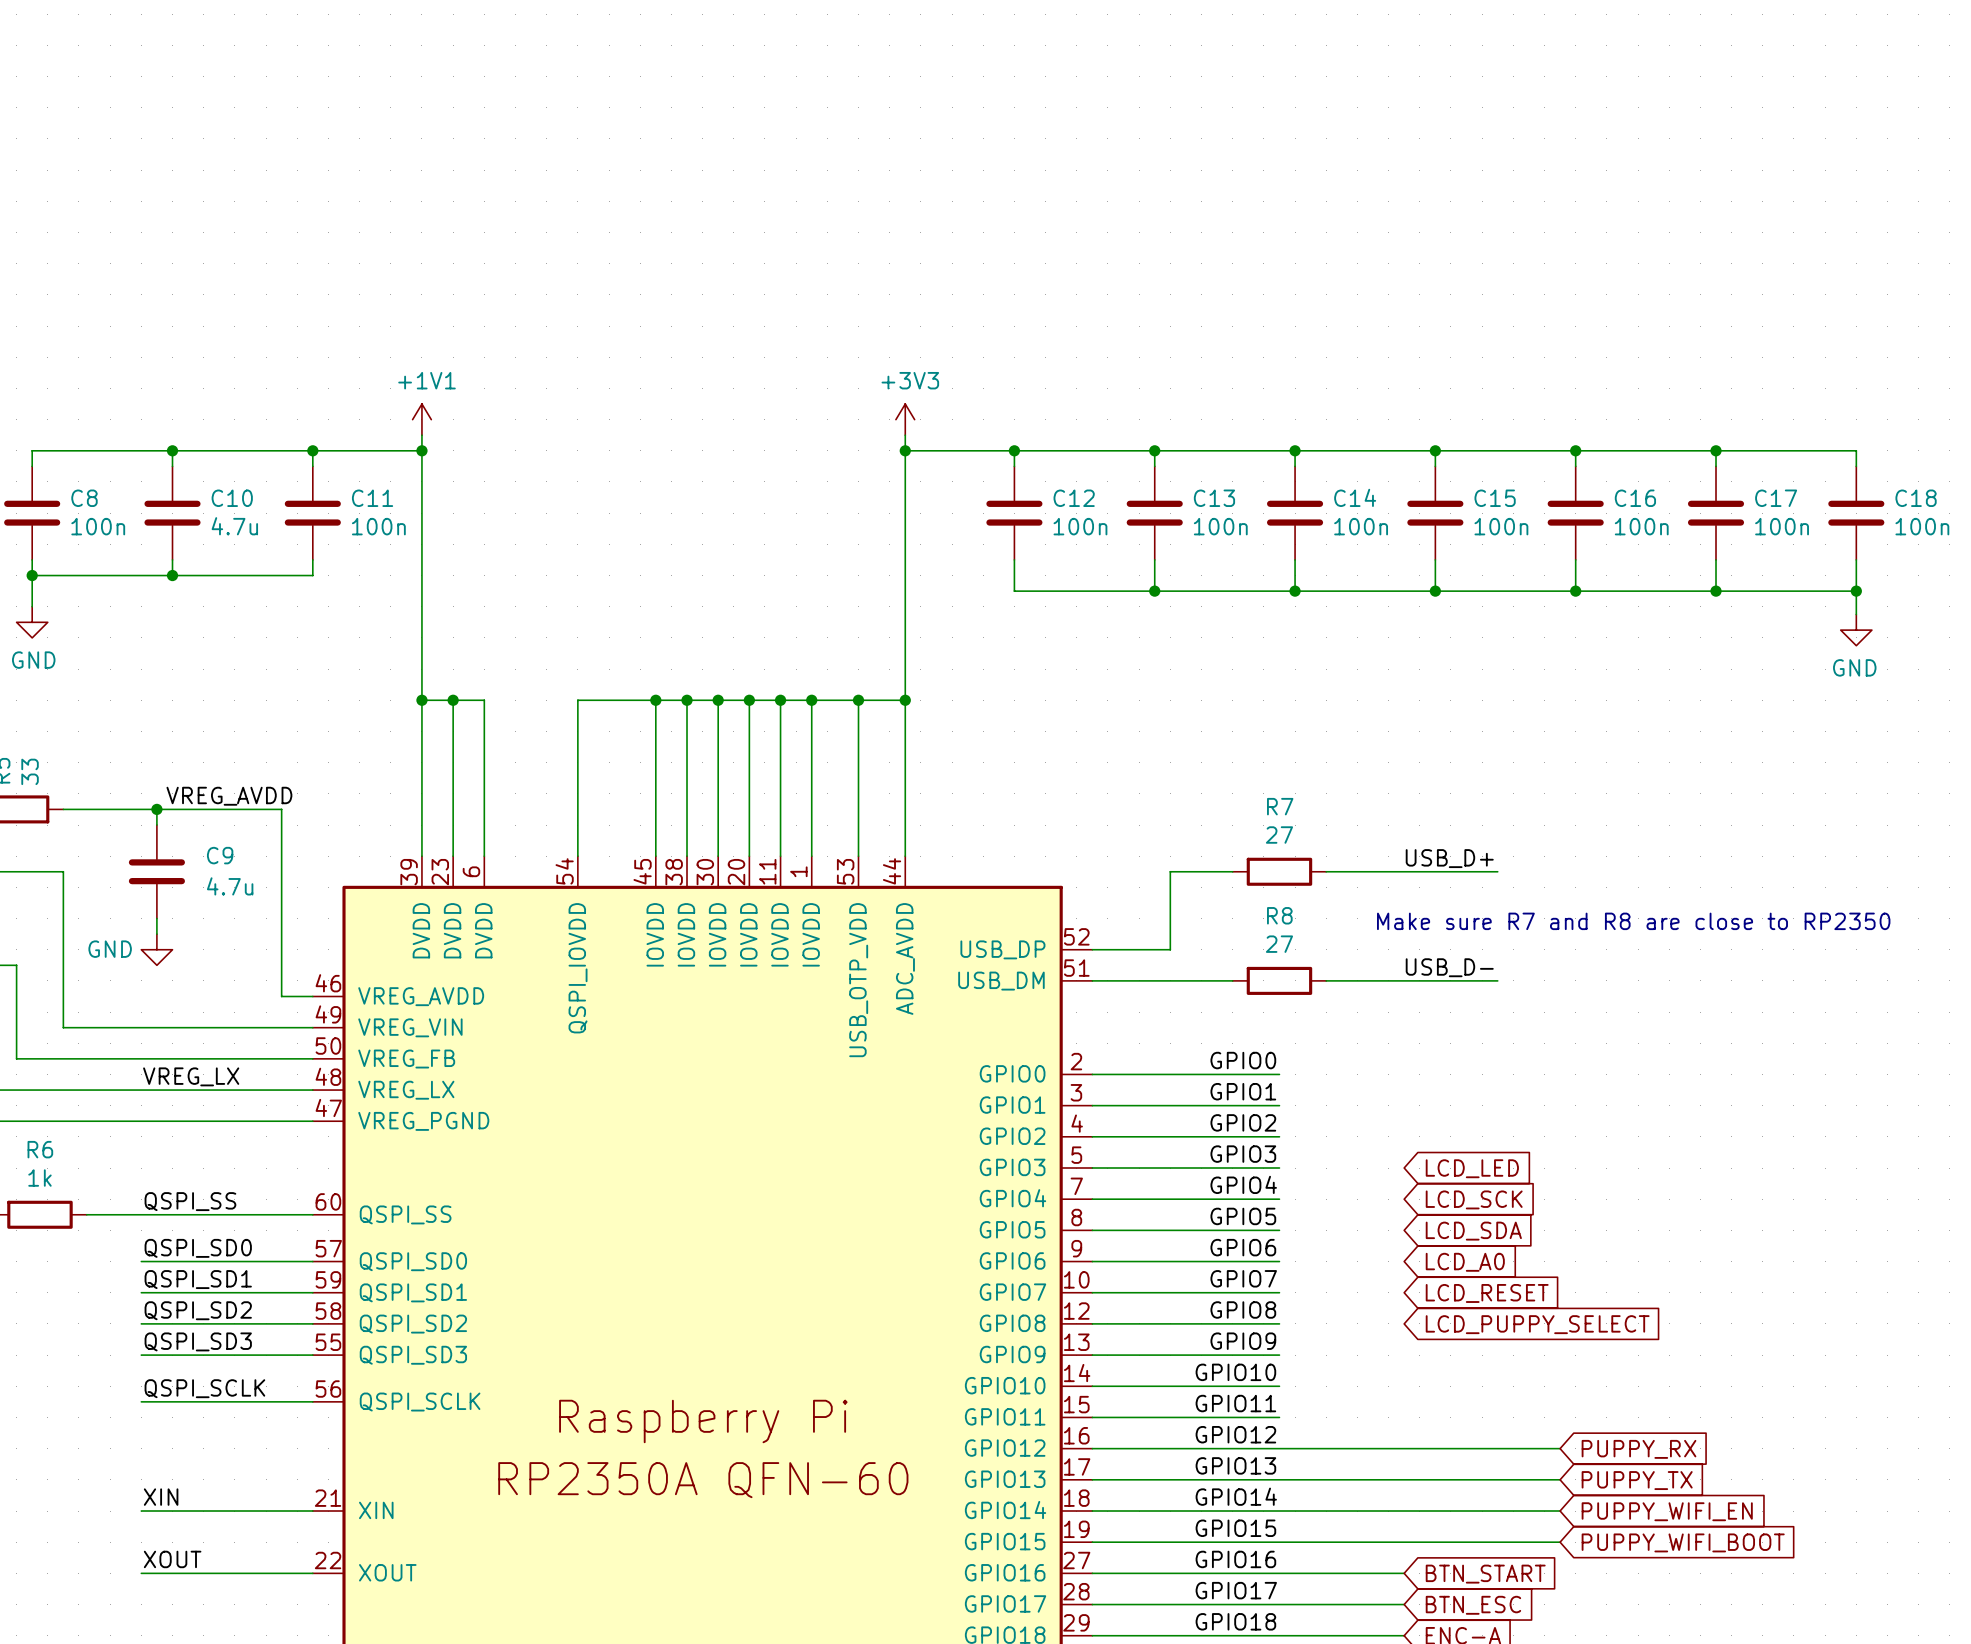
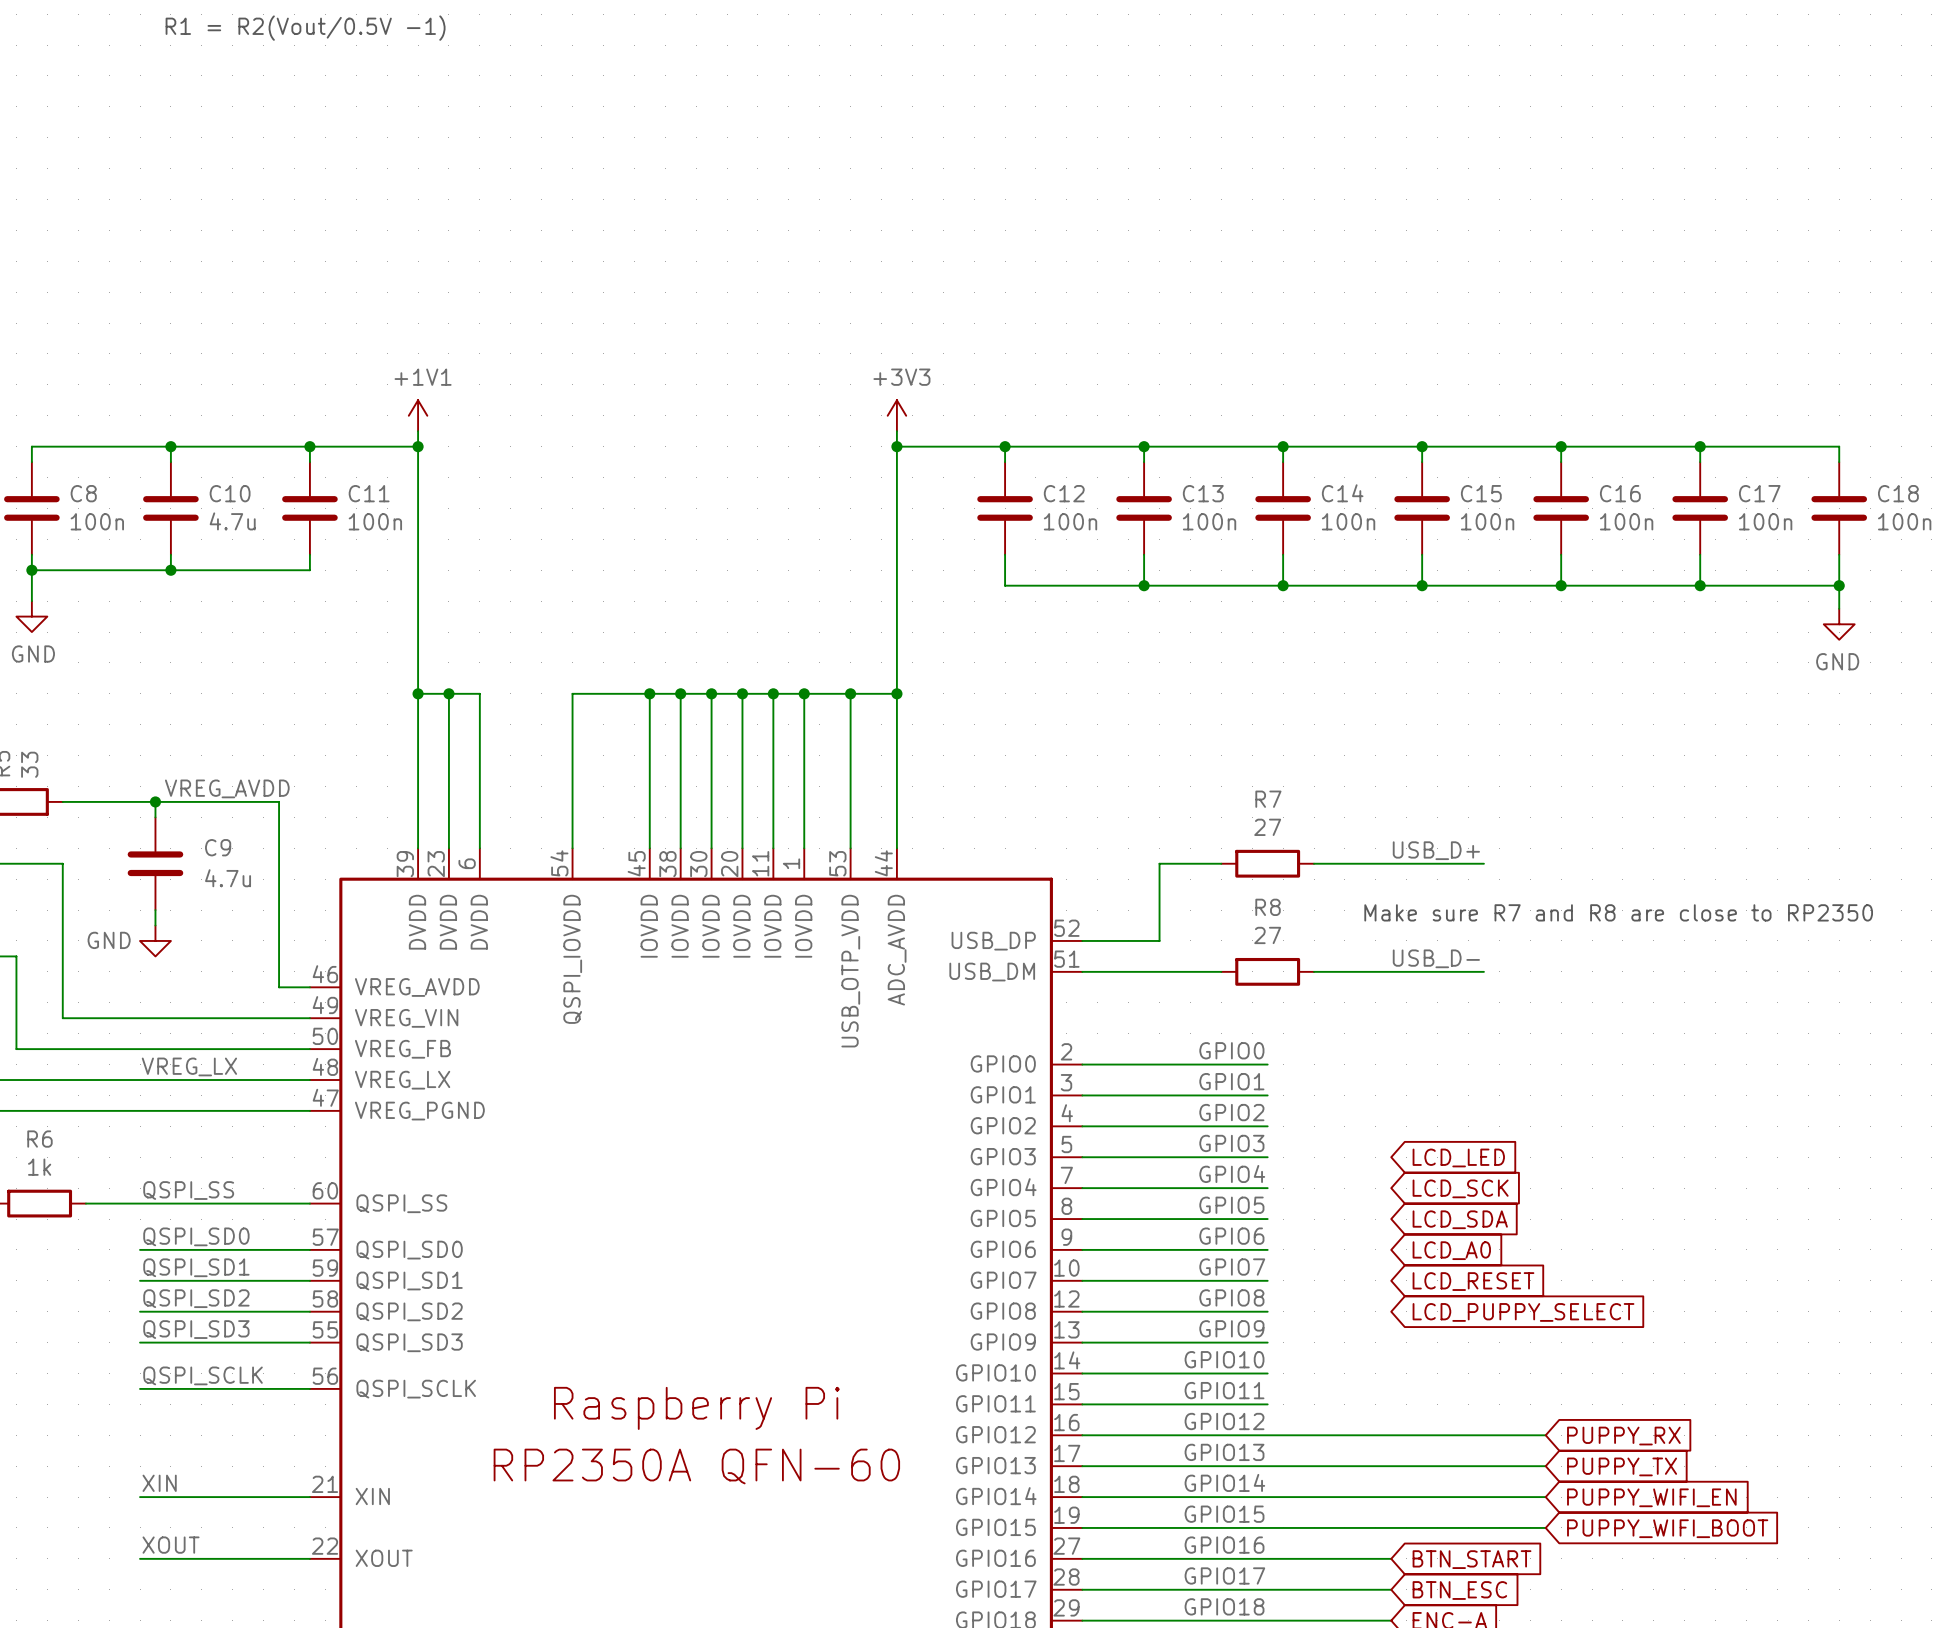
text: none -> R1 = R2(Vout/0.5V -1) (305, 28)

